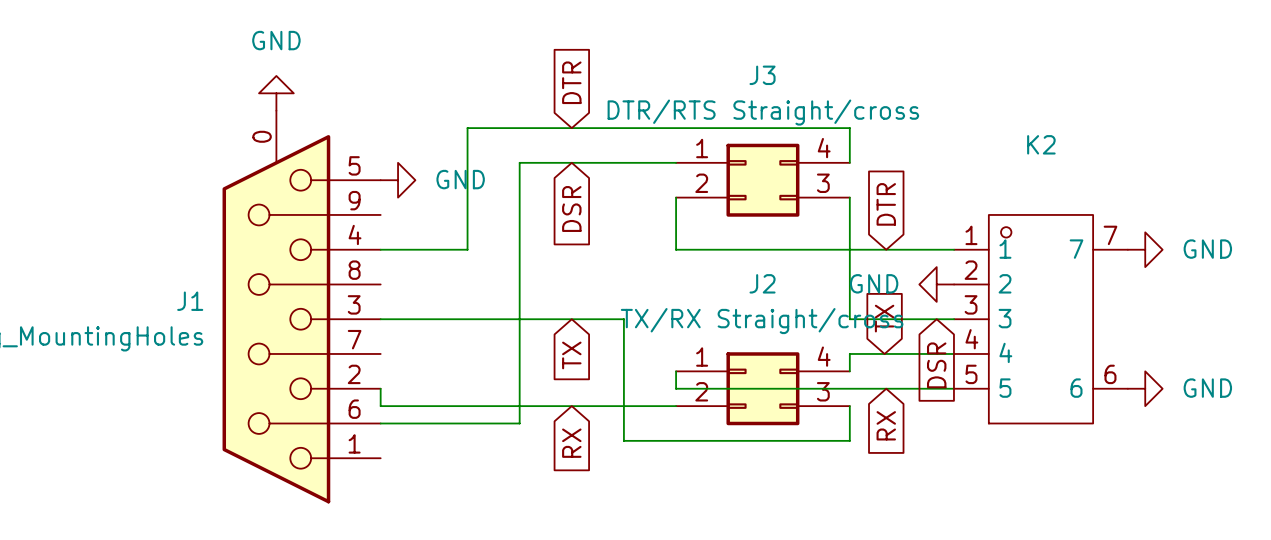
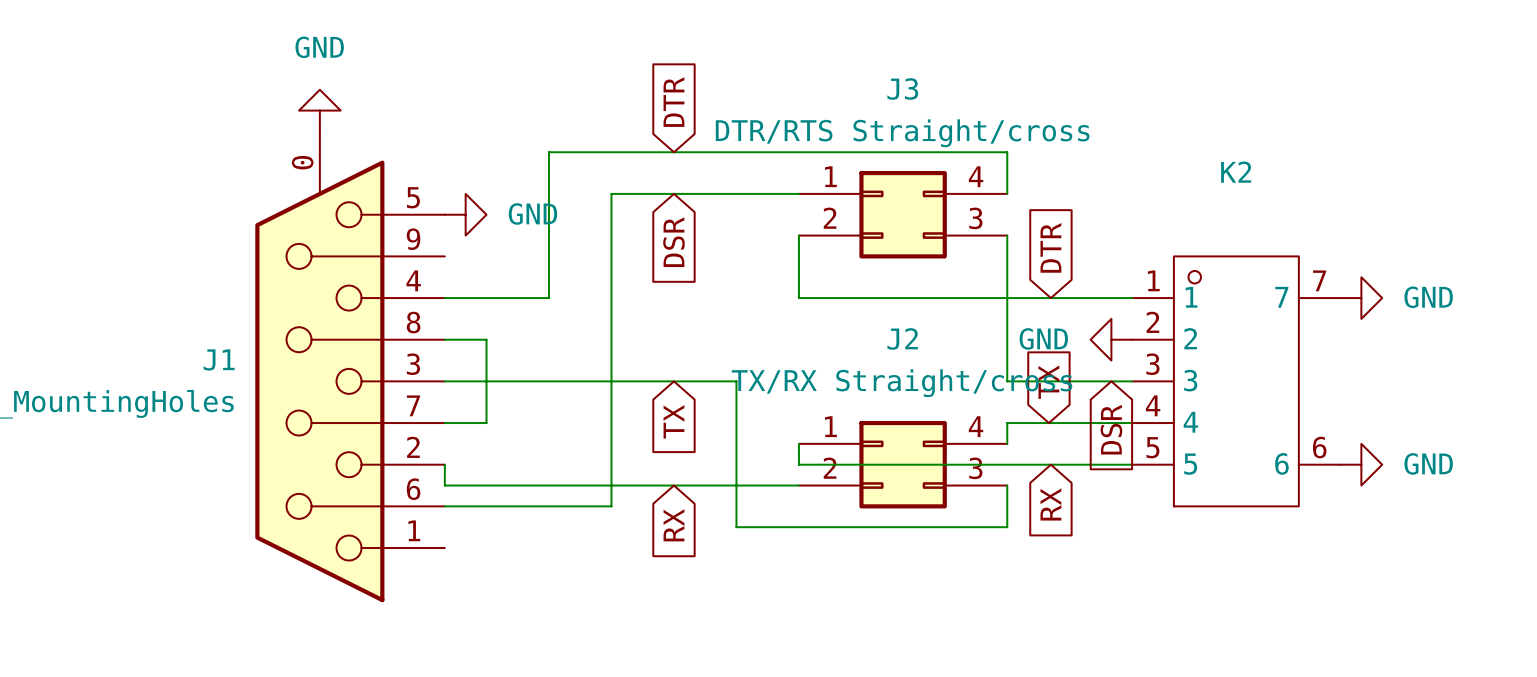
wire: none -> (444, 339) (486, 339) (486, 423) (444, 423)

